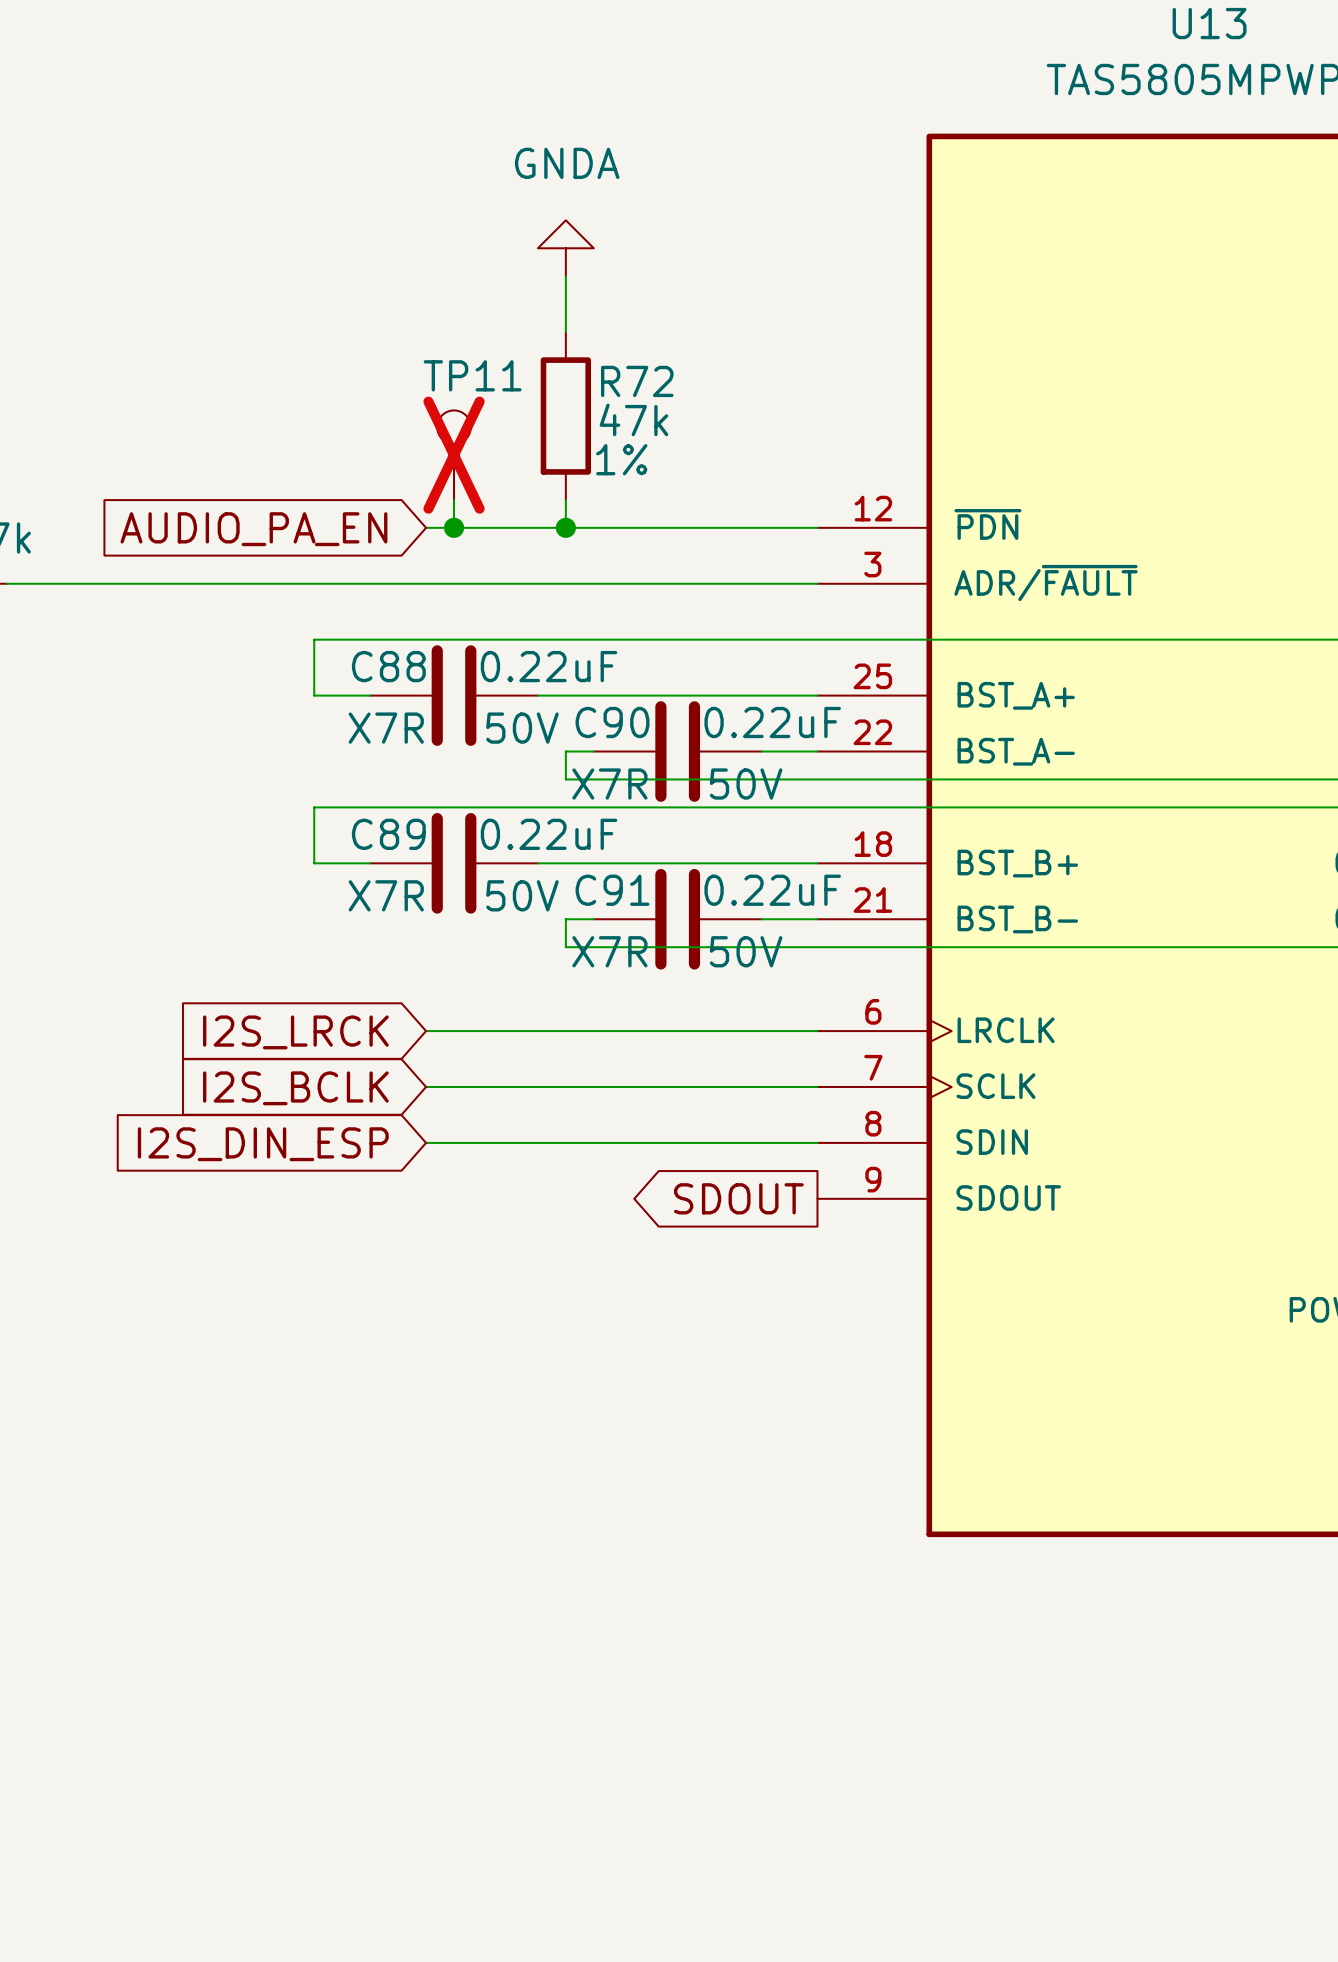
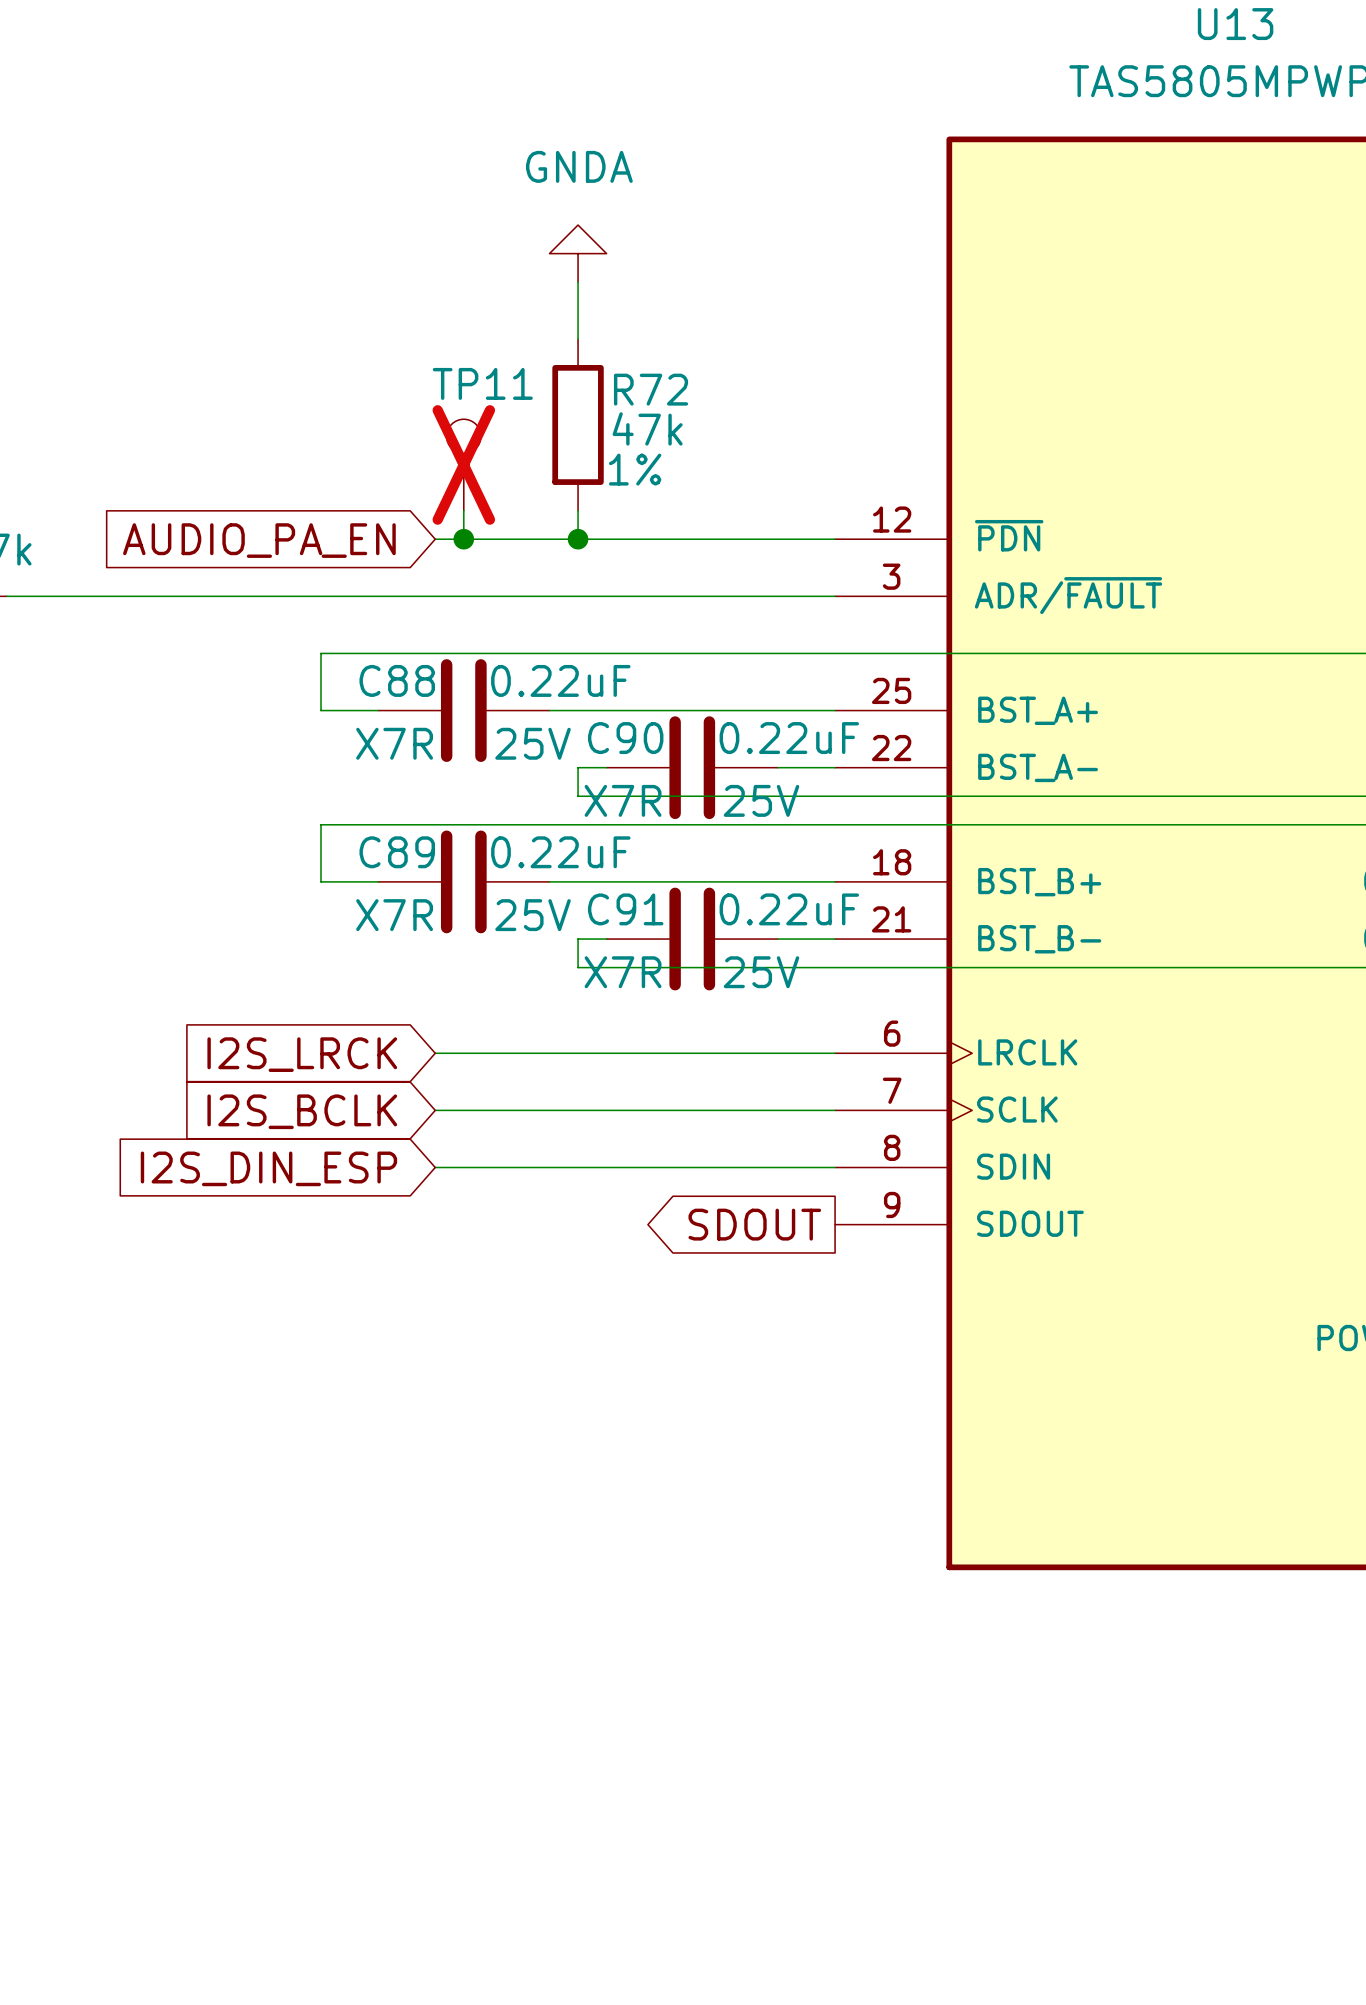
C88 text: 50V (522, 728) -> 25V (533, 743)
C90 text: 50V (746, 784) -> 25V (761, 800)
C89 text: 50V (522, 895) -> 25V (533, 915)
C91 text: 50V (746, 951) -> 25V (761, 972)

